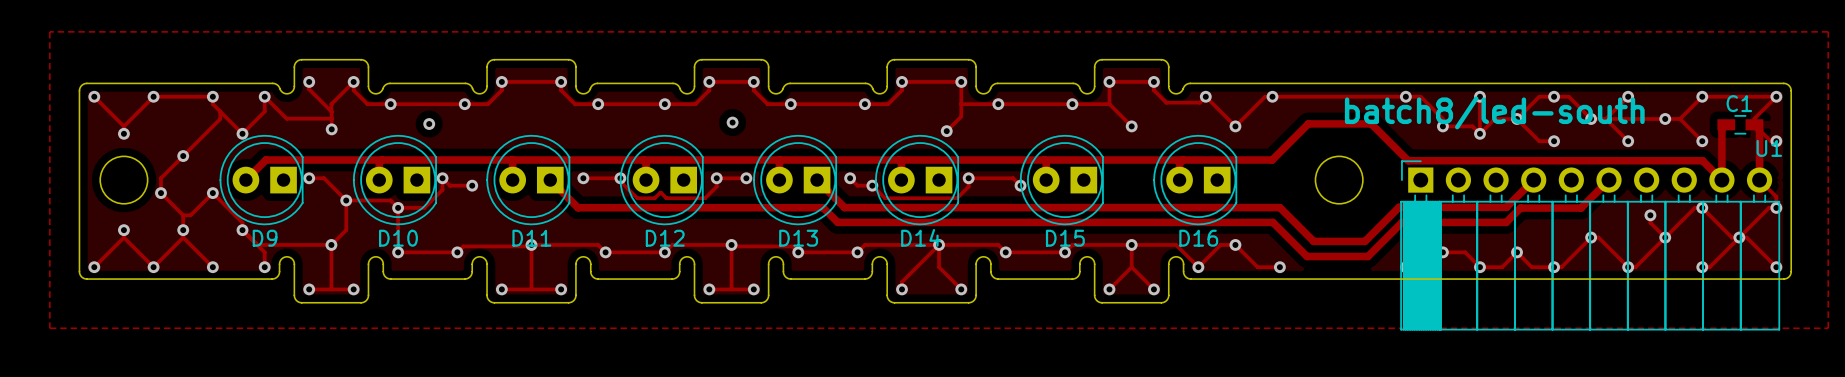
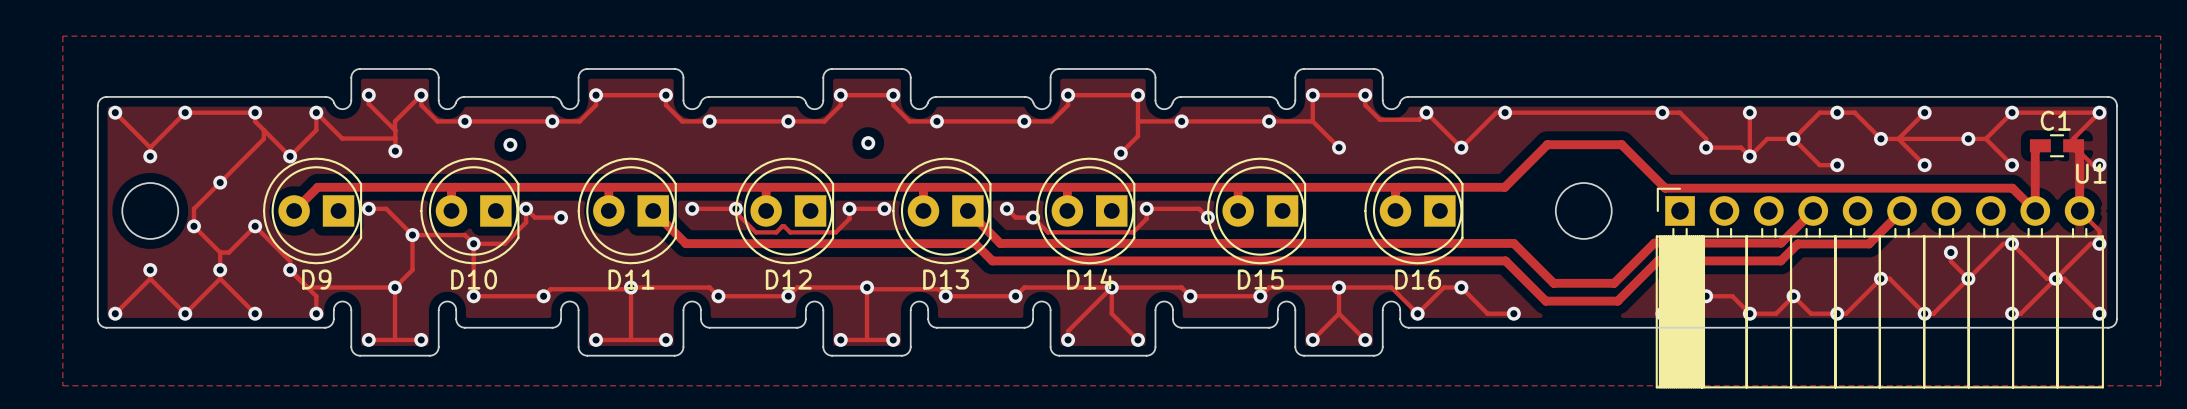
text: batch8/led-south (1494, 112) -> none

